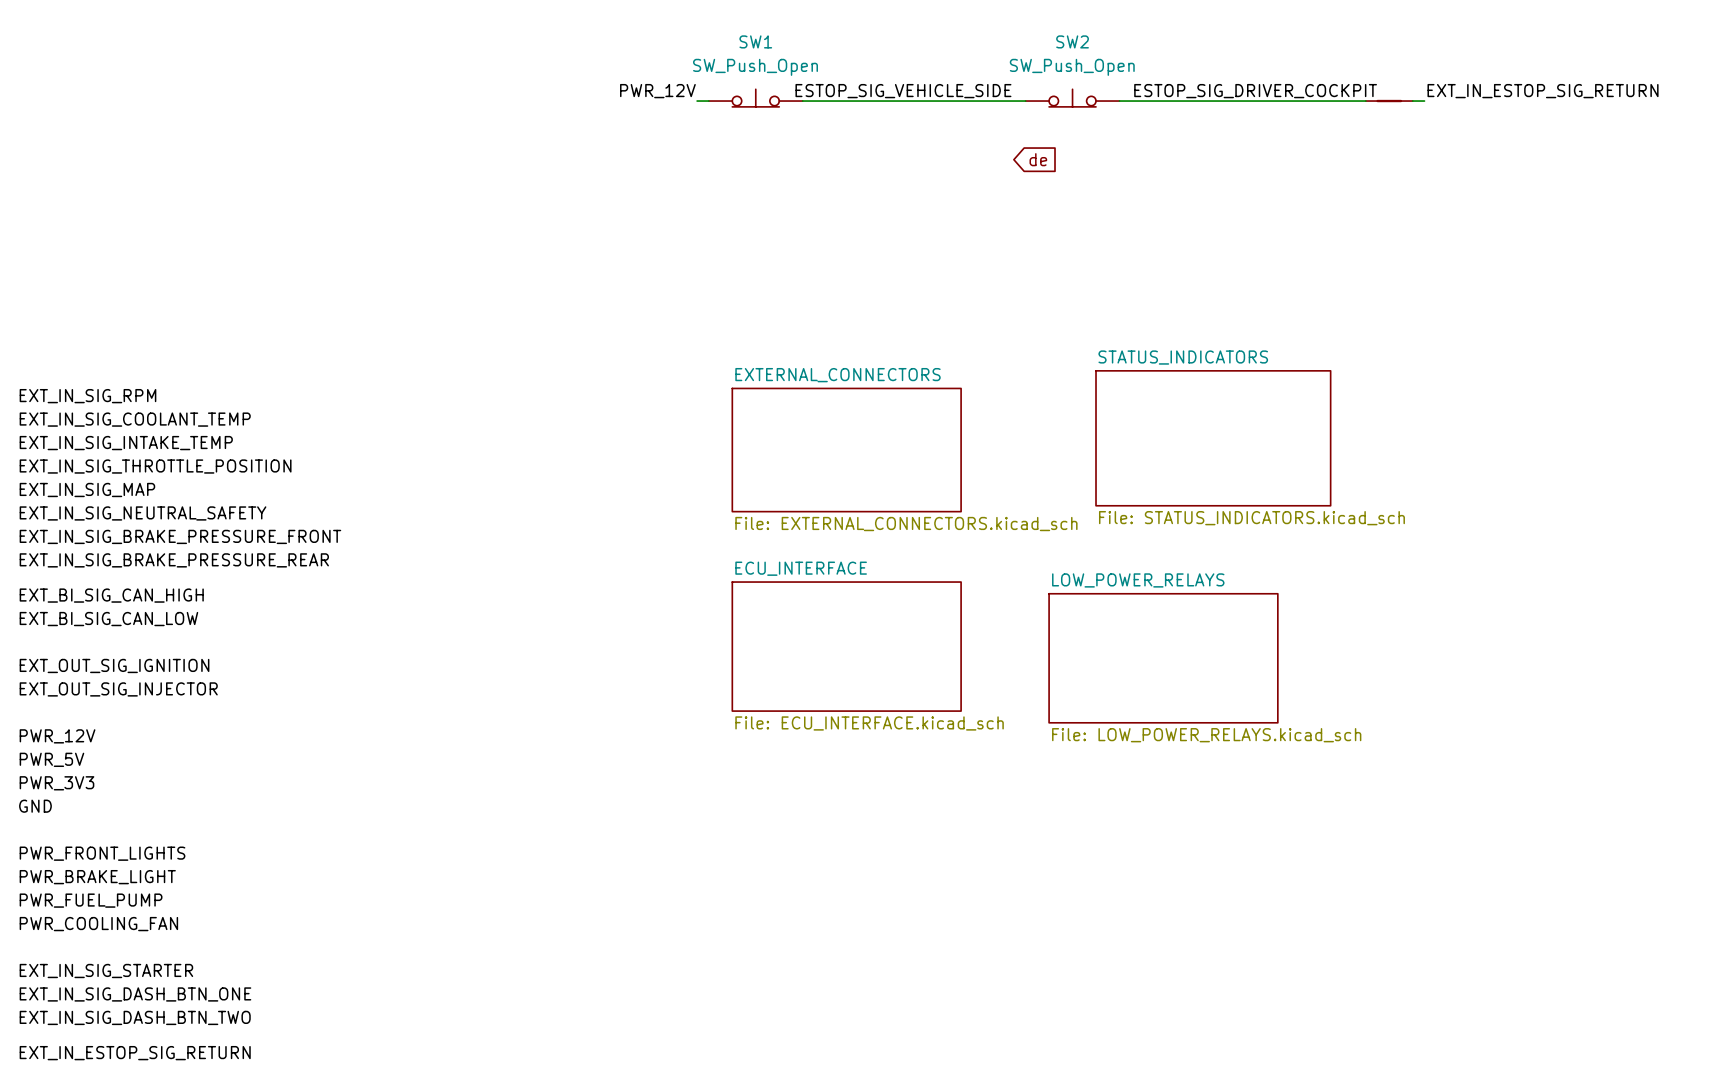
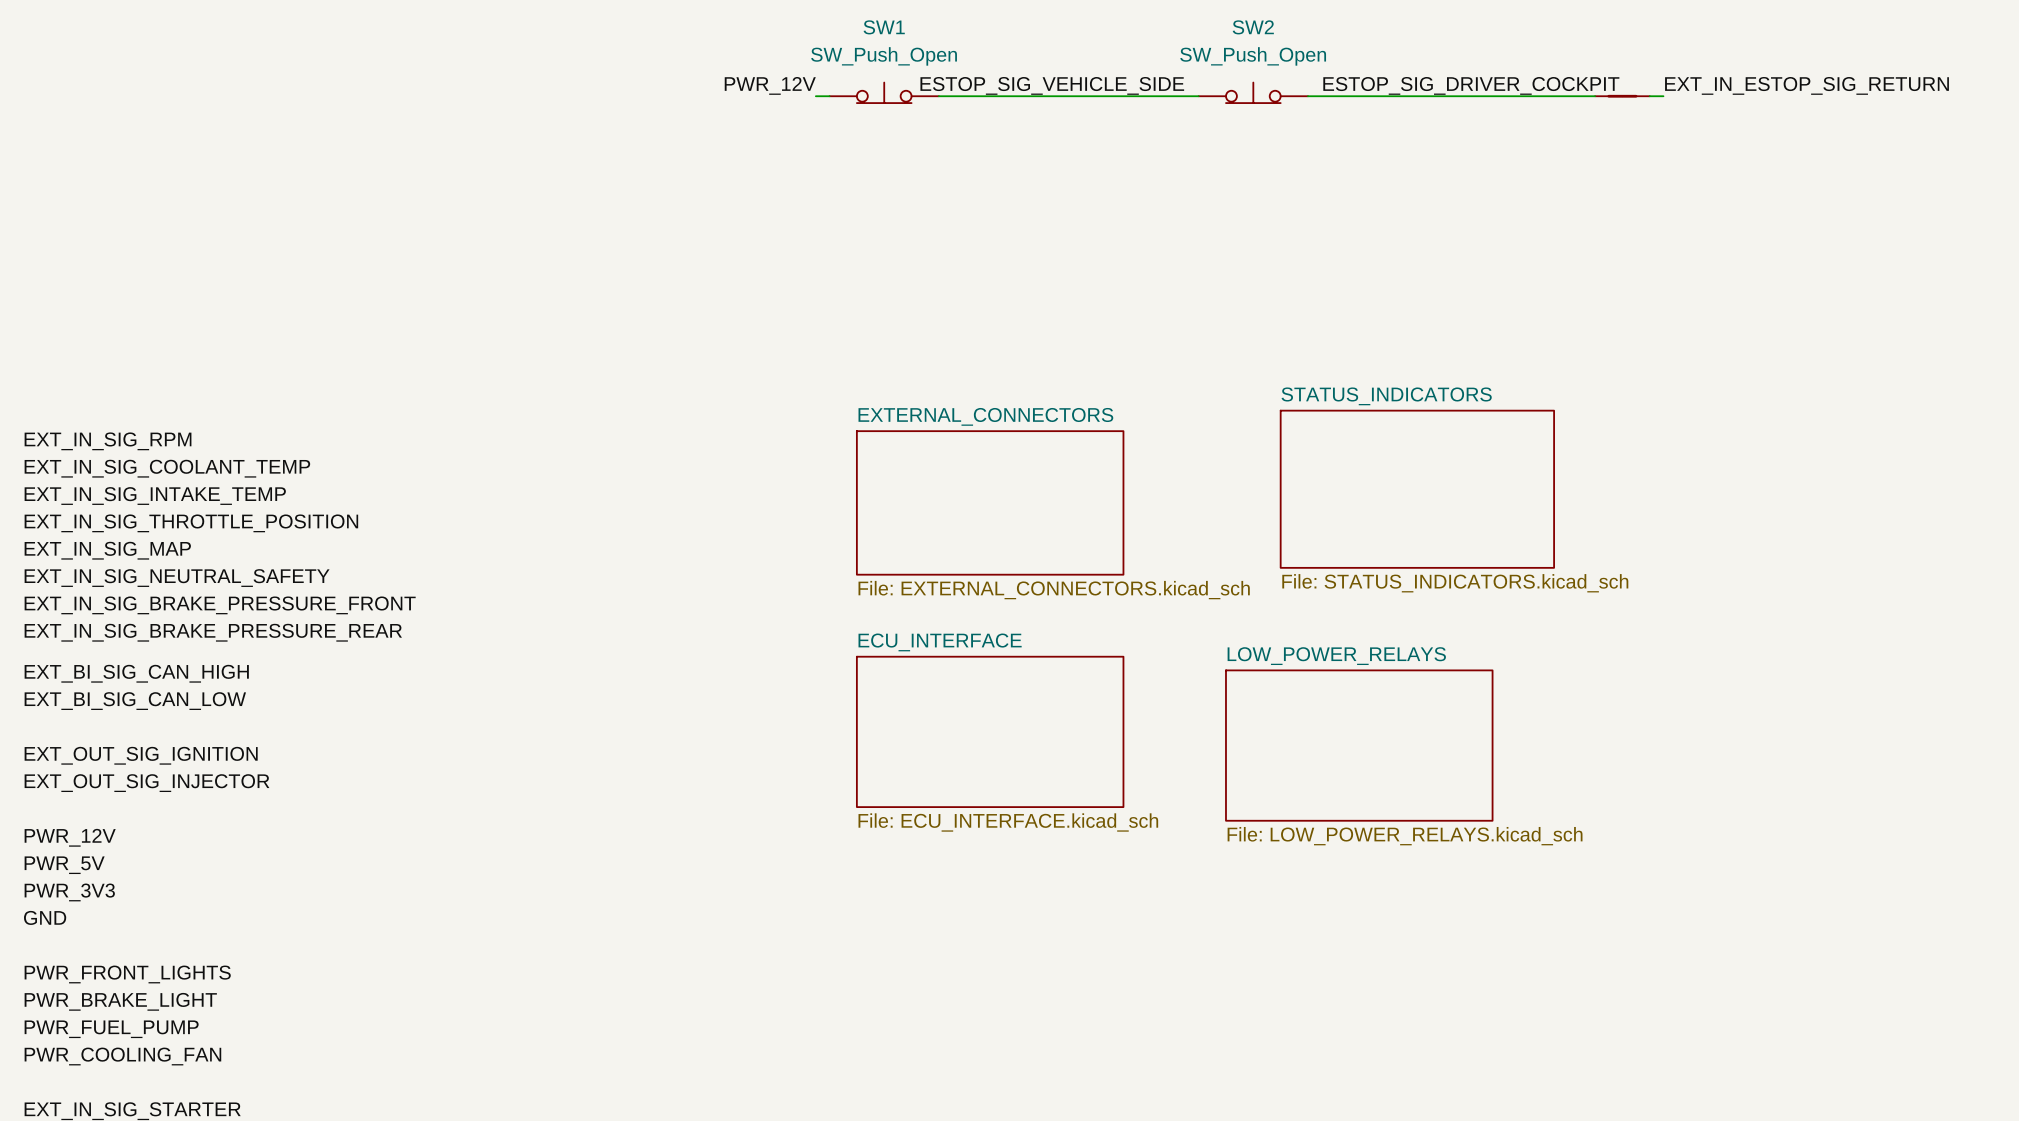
global label: de (1038, 159) -> none

